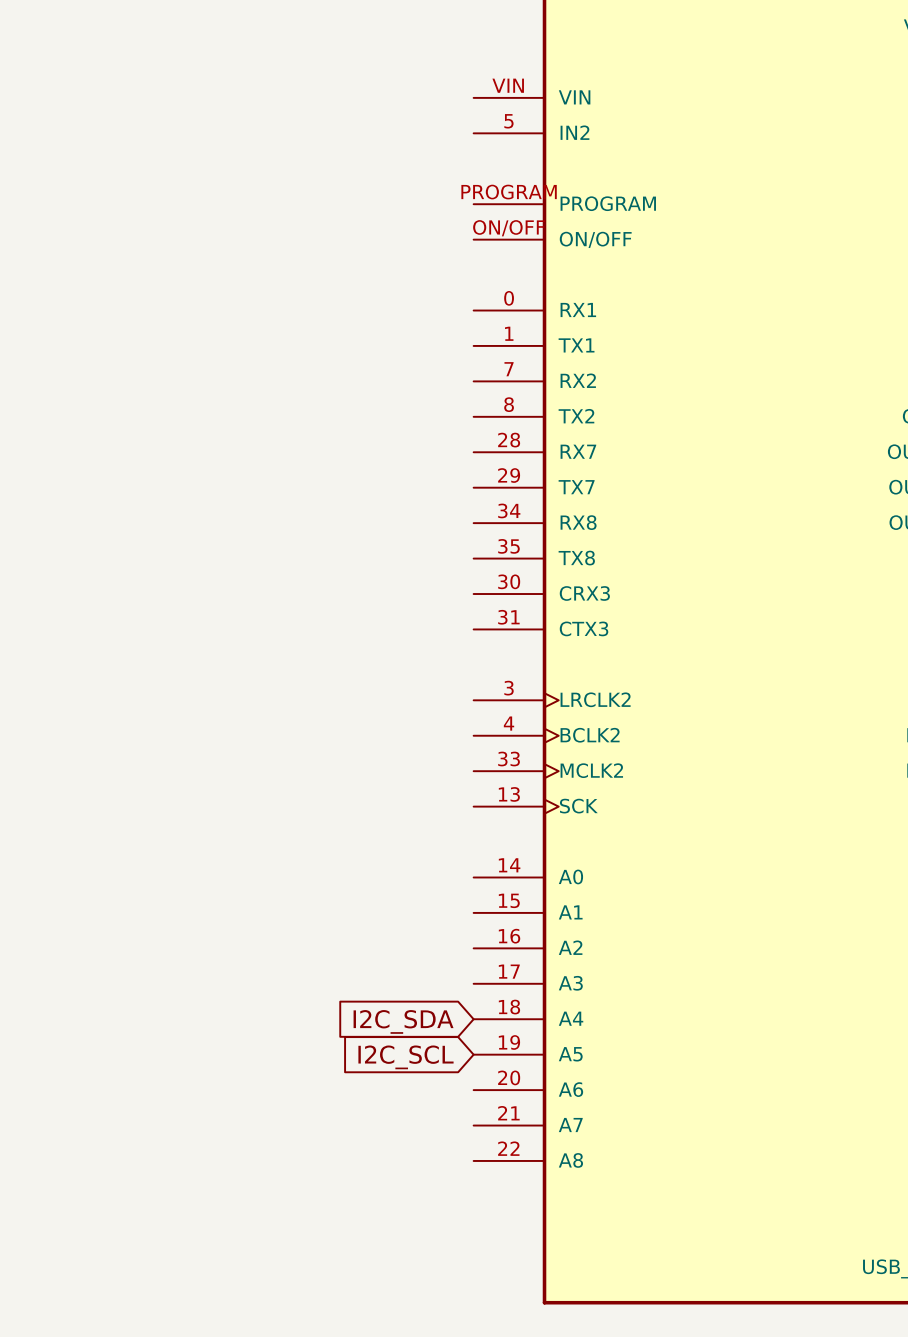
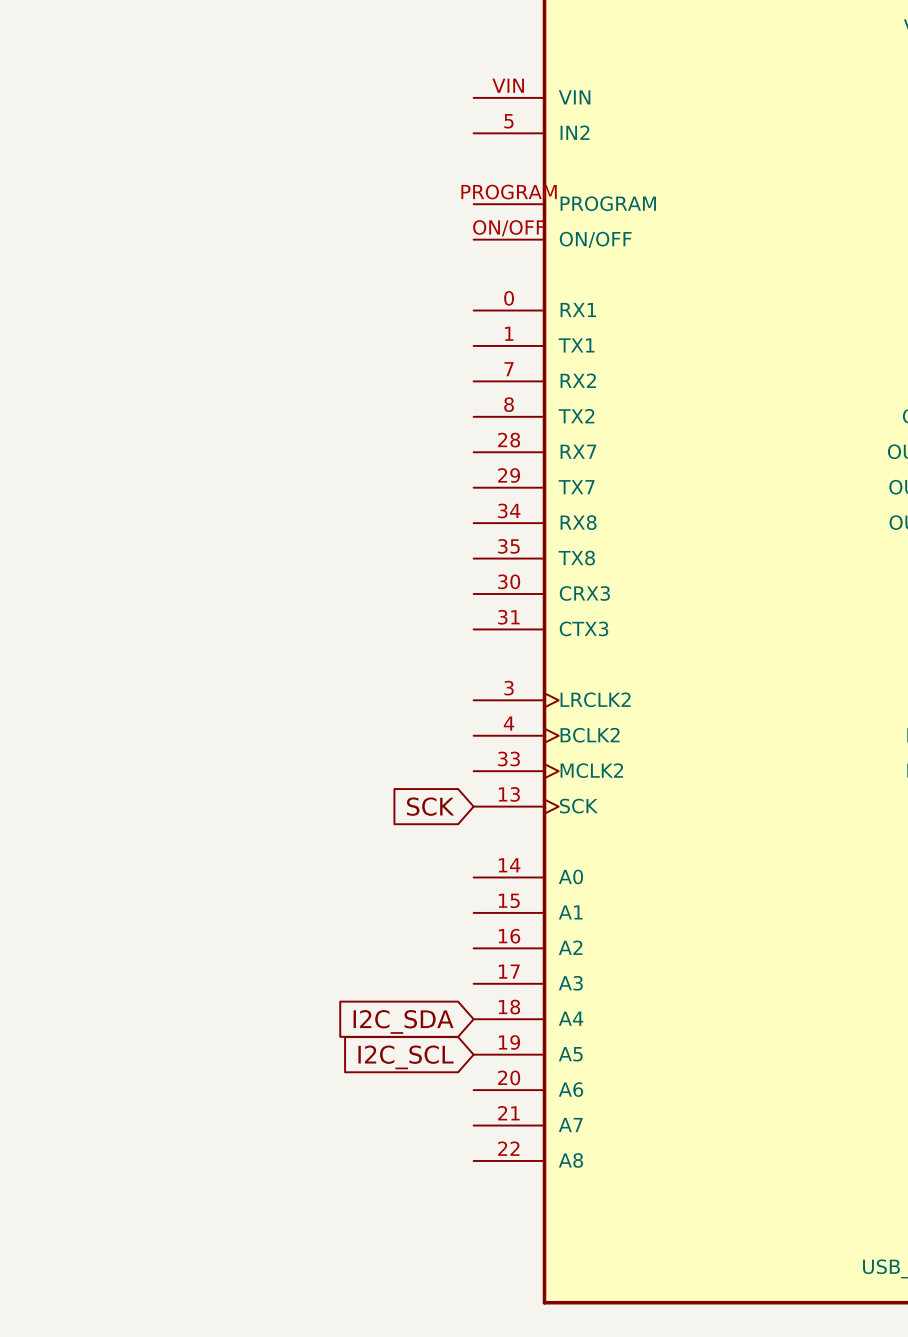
global label: none -> SCK (430, 806)

